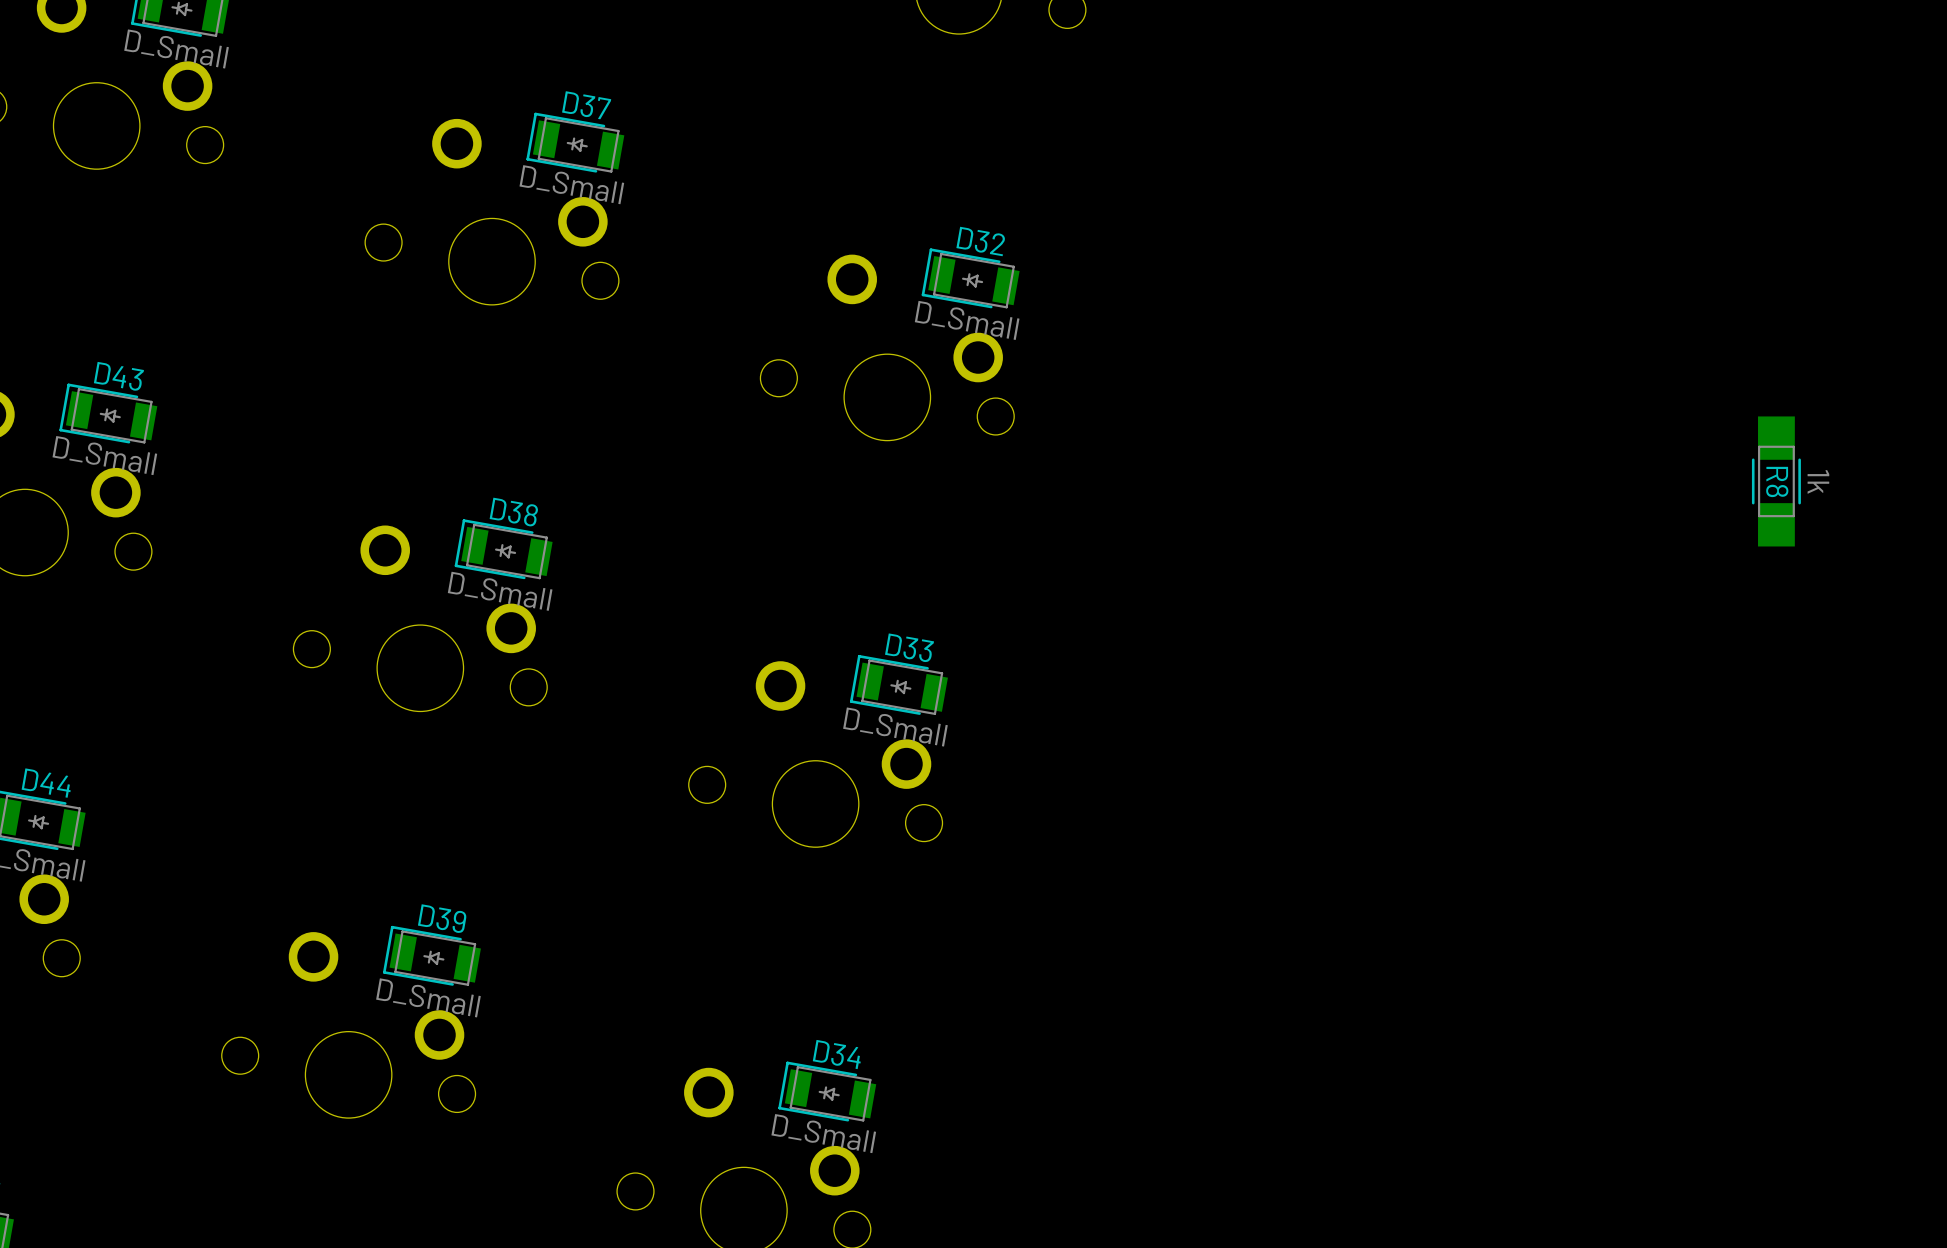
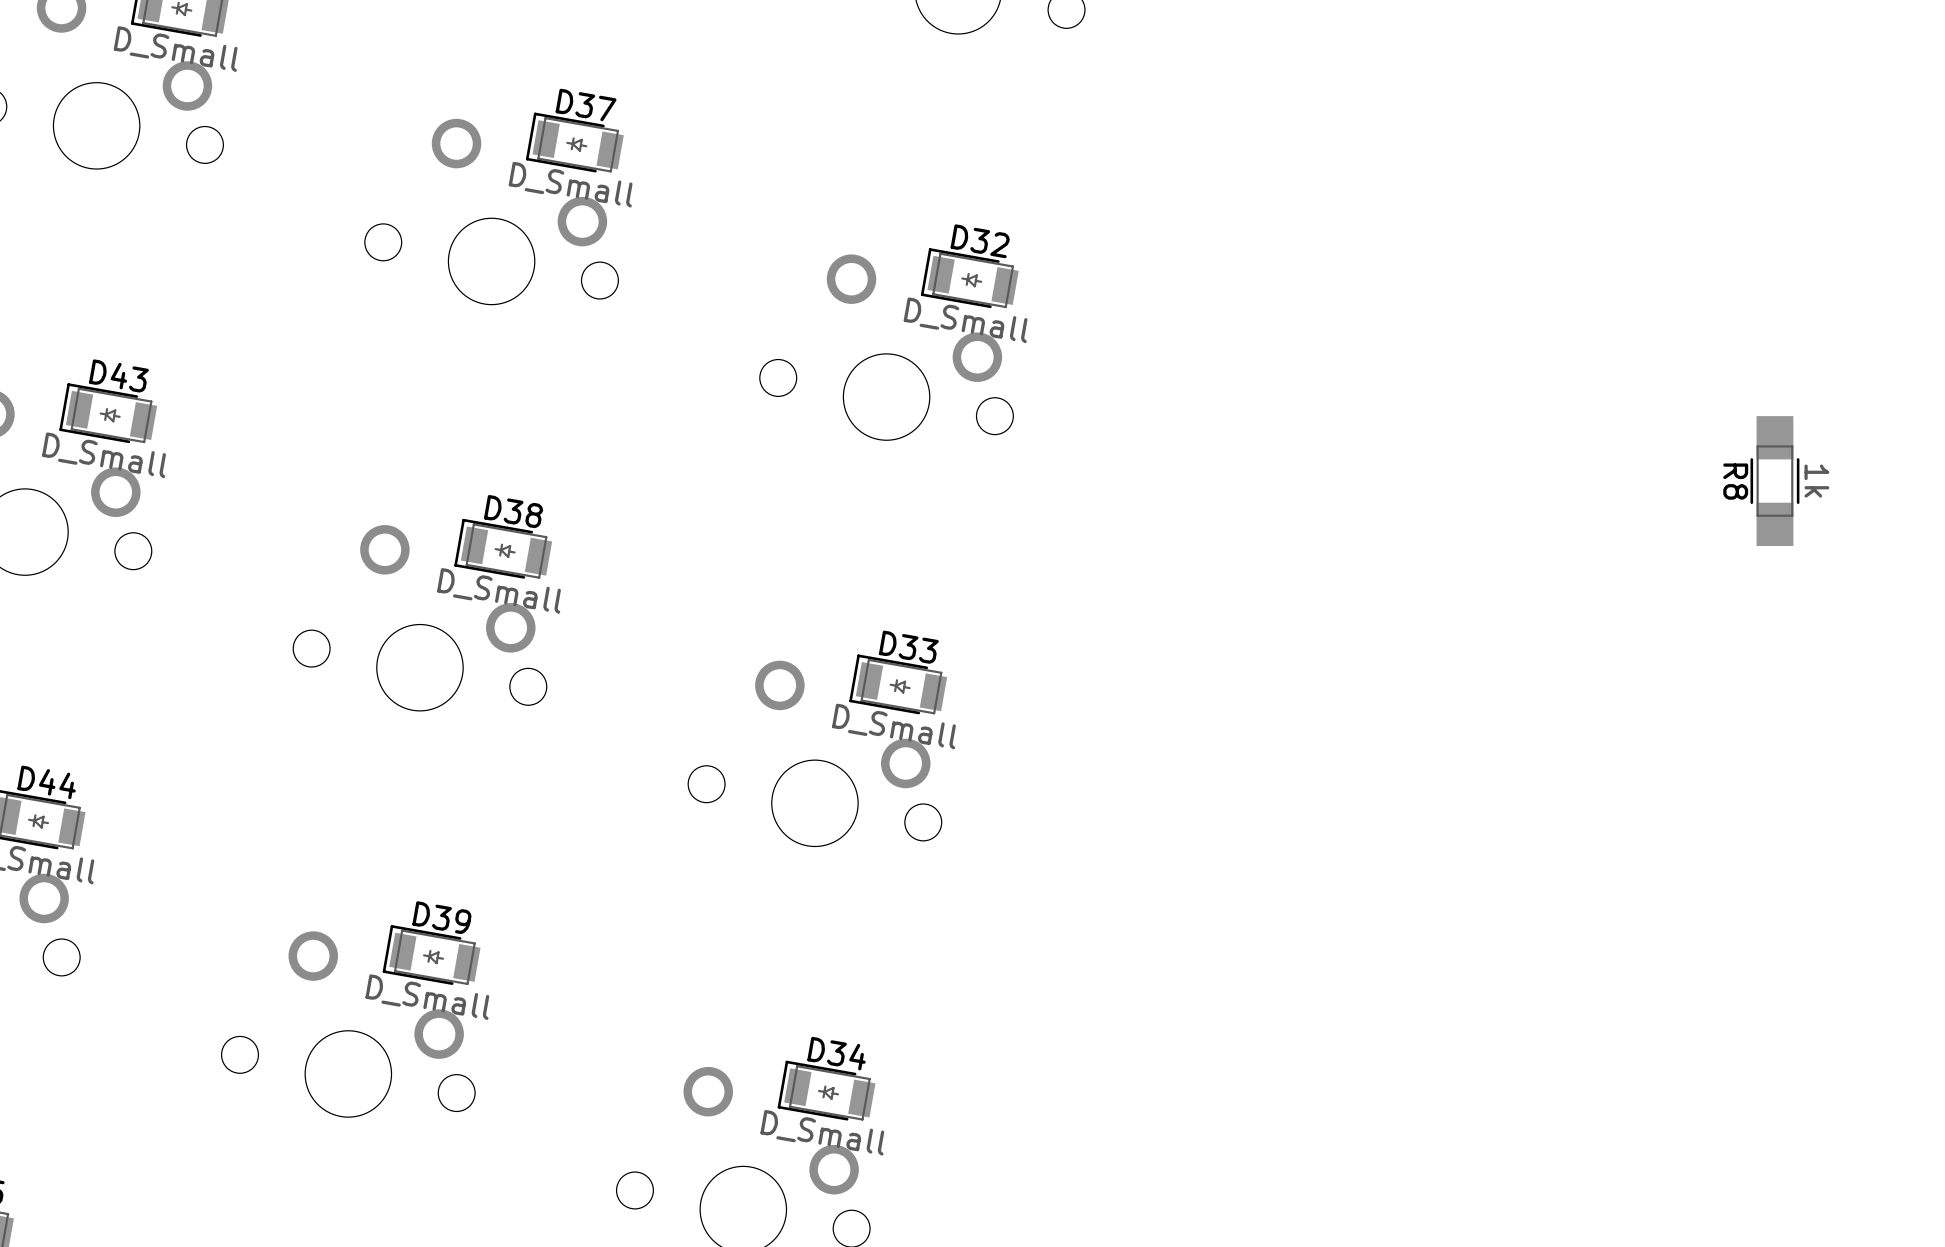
R8 name position: R8 (1777, 481) -> R8 (1735, 481)

